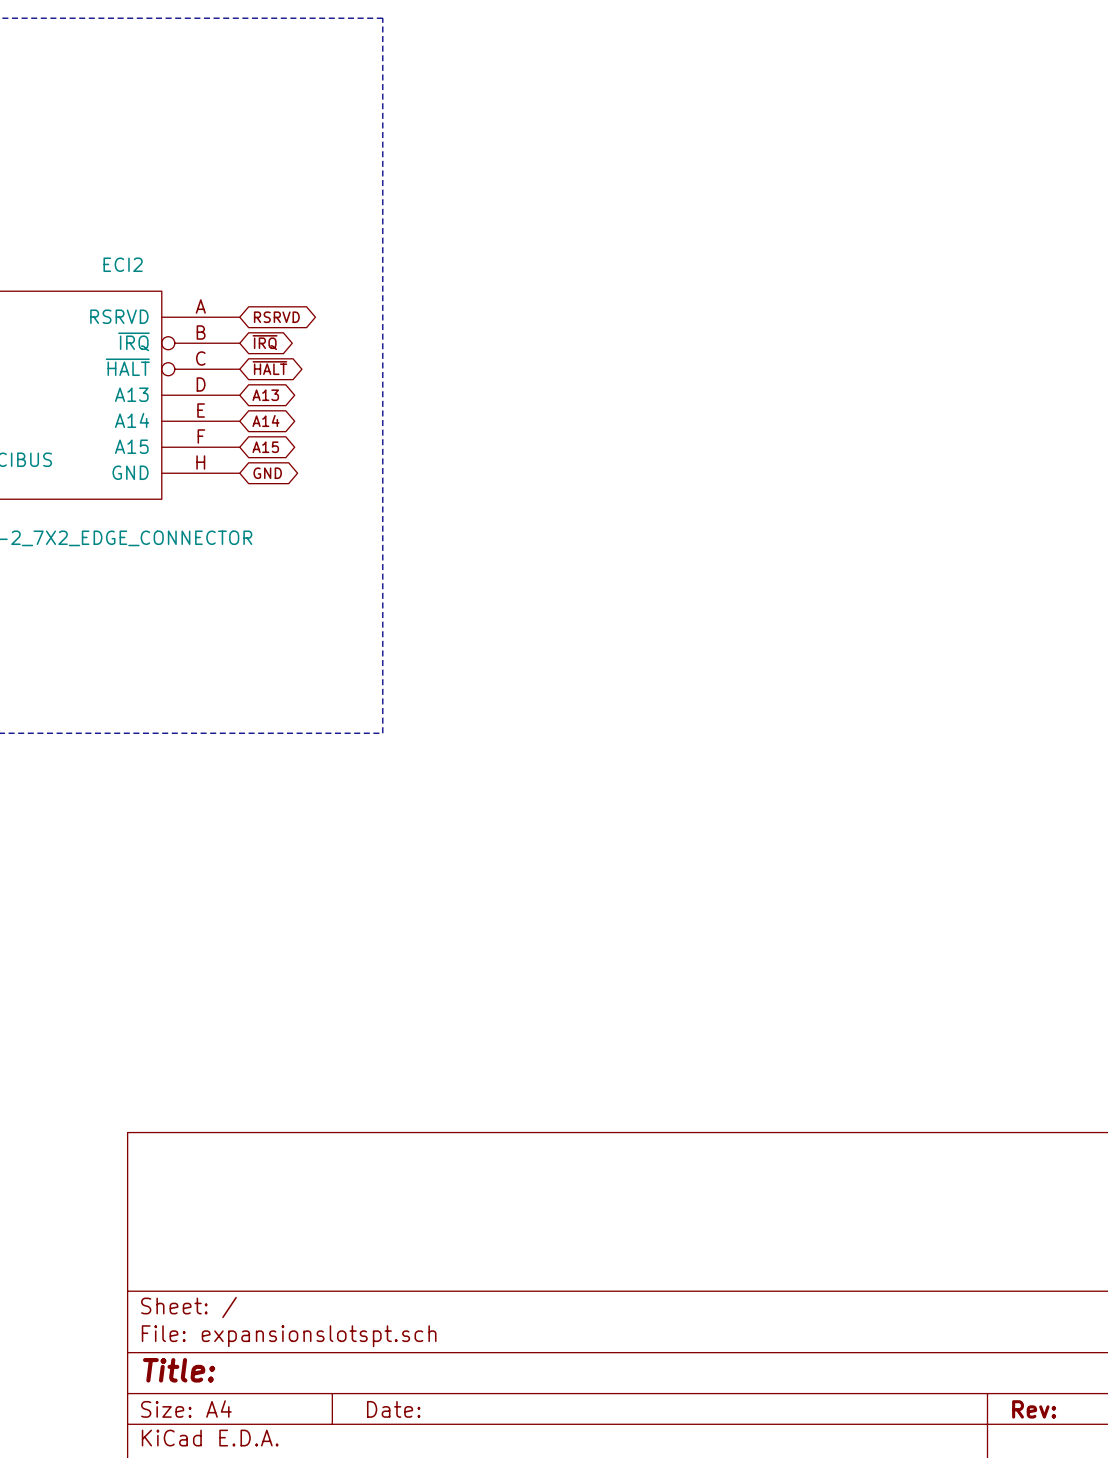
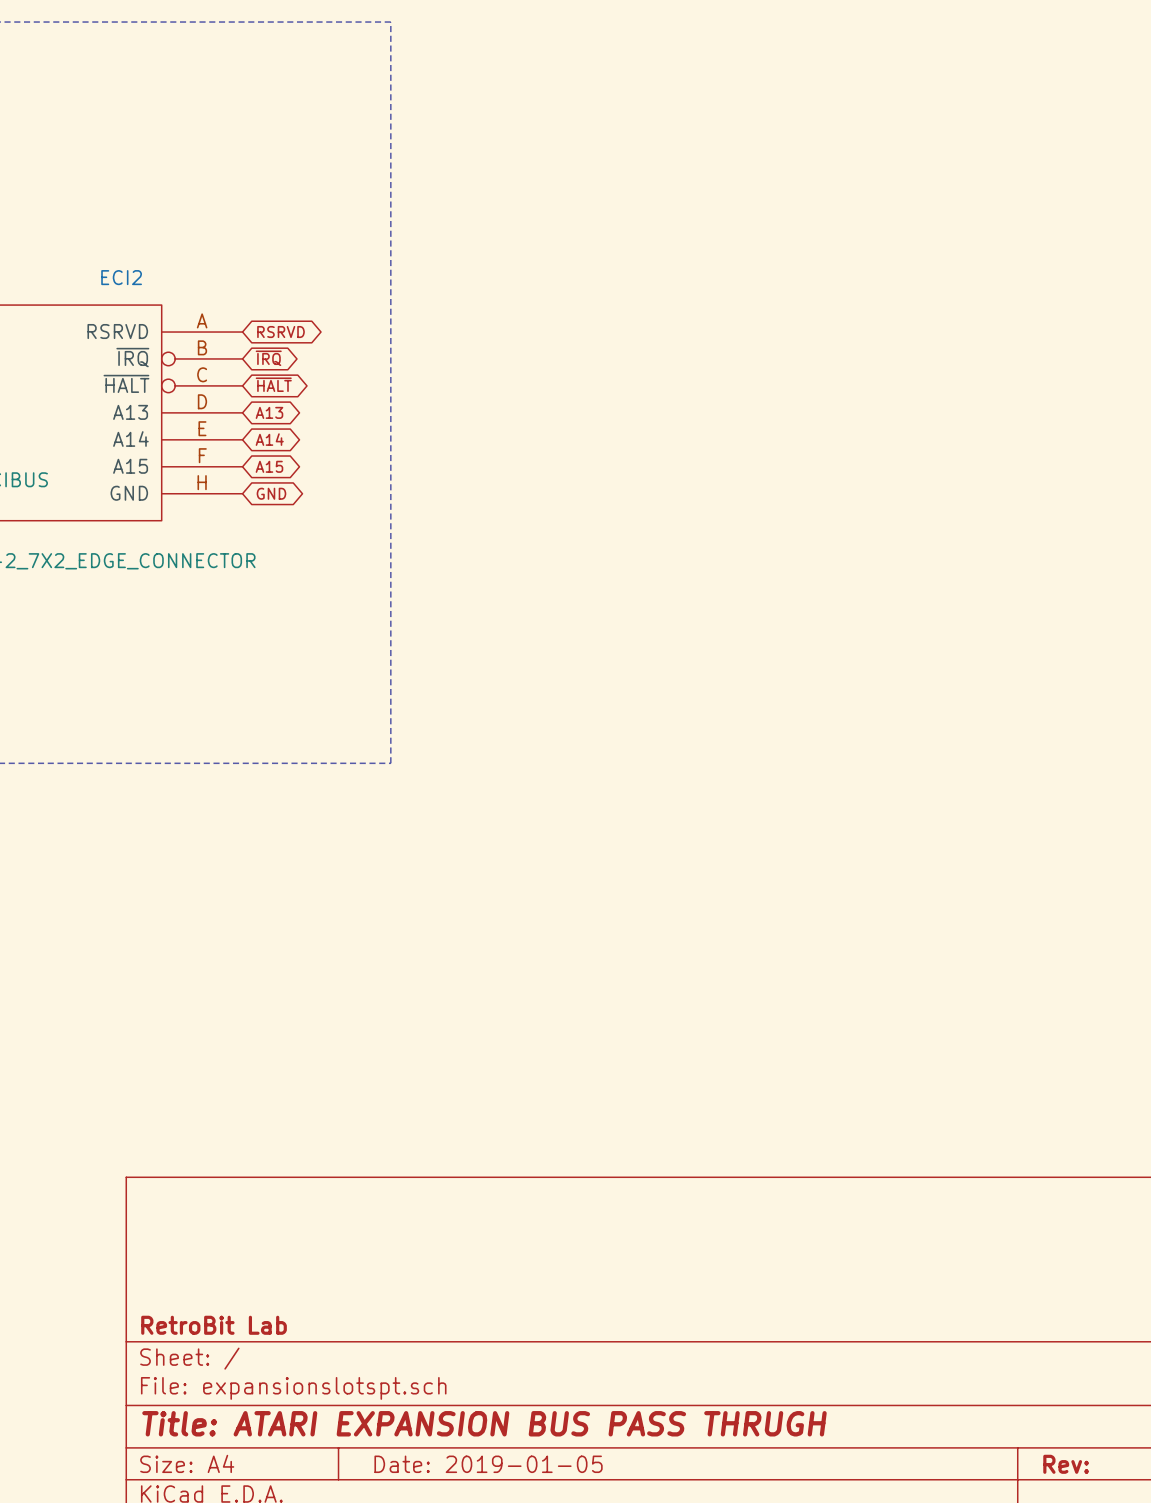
title block: none -> RetroBit Lab (214, 1325)
title block: Title: (179, 1370) -> Title: ATARI EXPANSION BUS PASS THRUGH (484, 1423)
title block: Date: (393, 1409) -> Date: 2019-01-05 (488, 1464)

